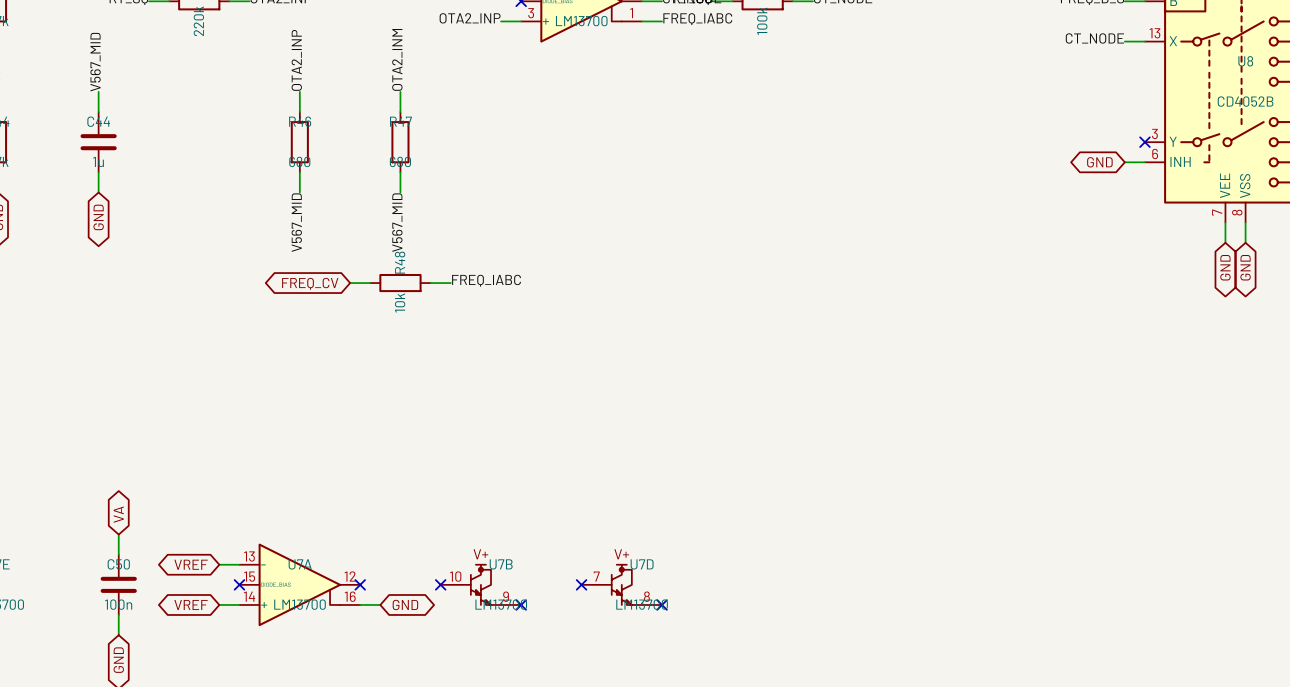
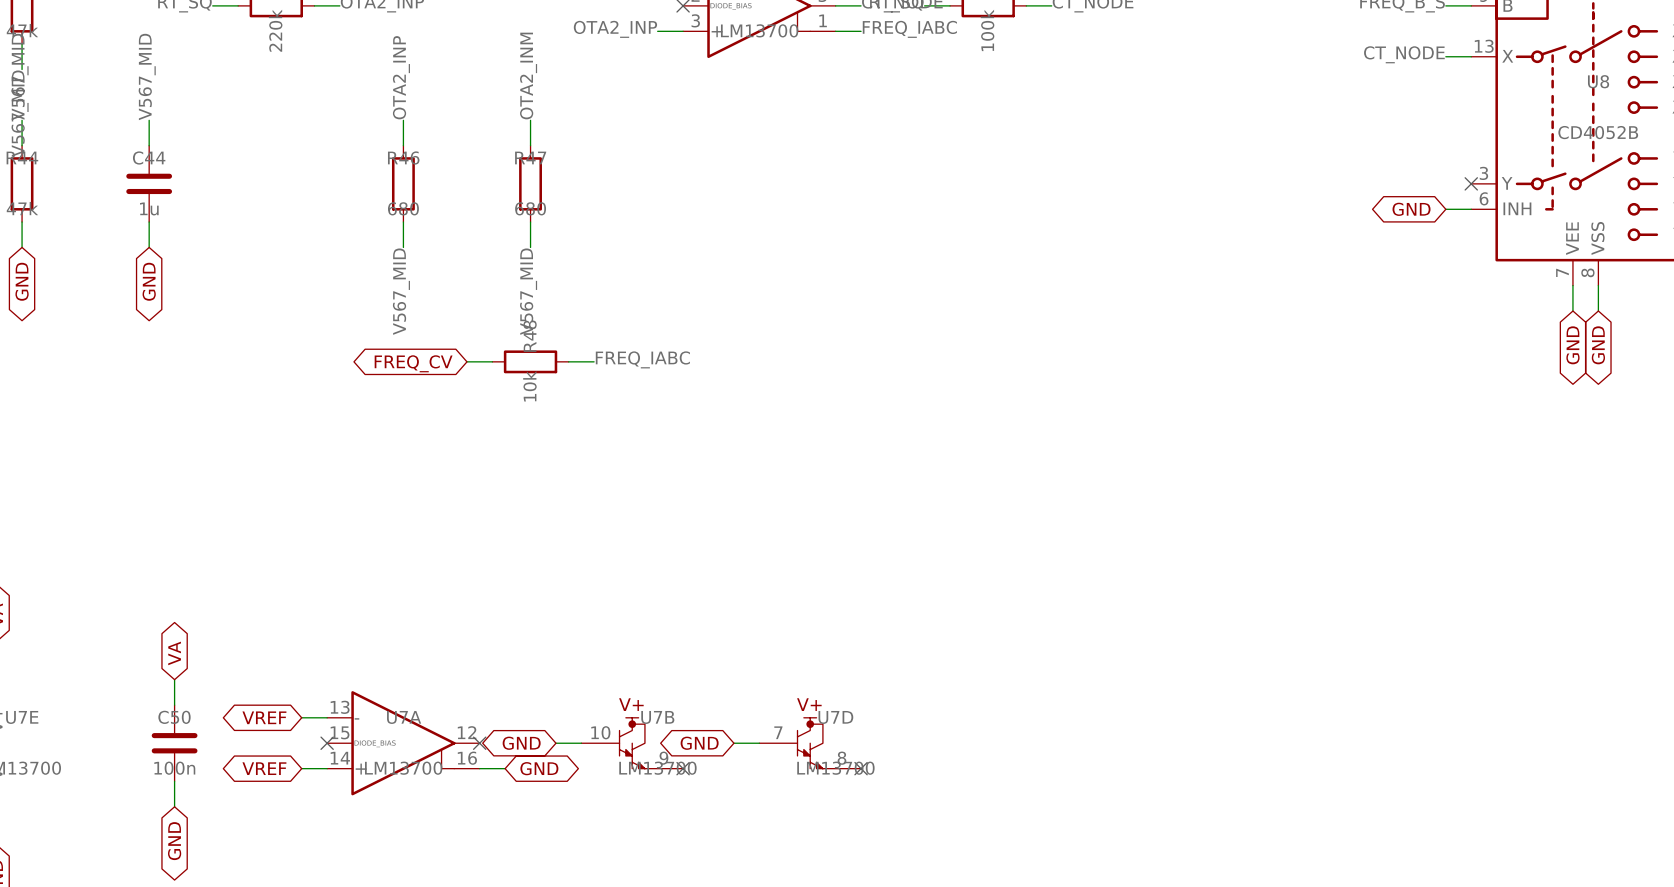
global label: none -> GND (521, 743)
wire: none -> (555, 743) (581, 743)
no-connect mark: (440, 584) -> none
global label: none -> GND (699, 743)
wire: none -> (733, 743) (759, 743)
no-connect mark: (581, 584) -> none

